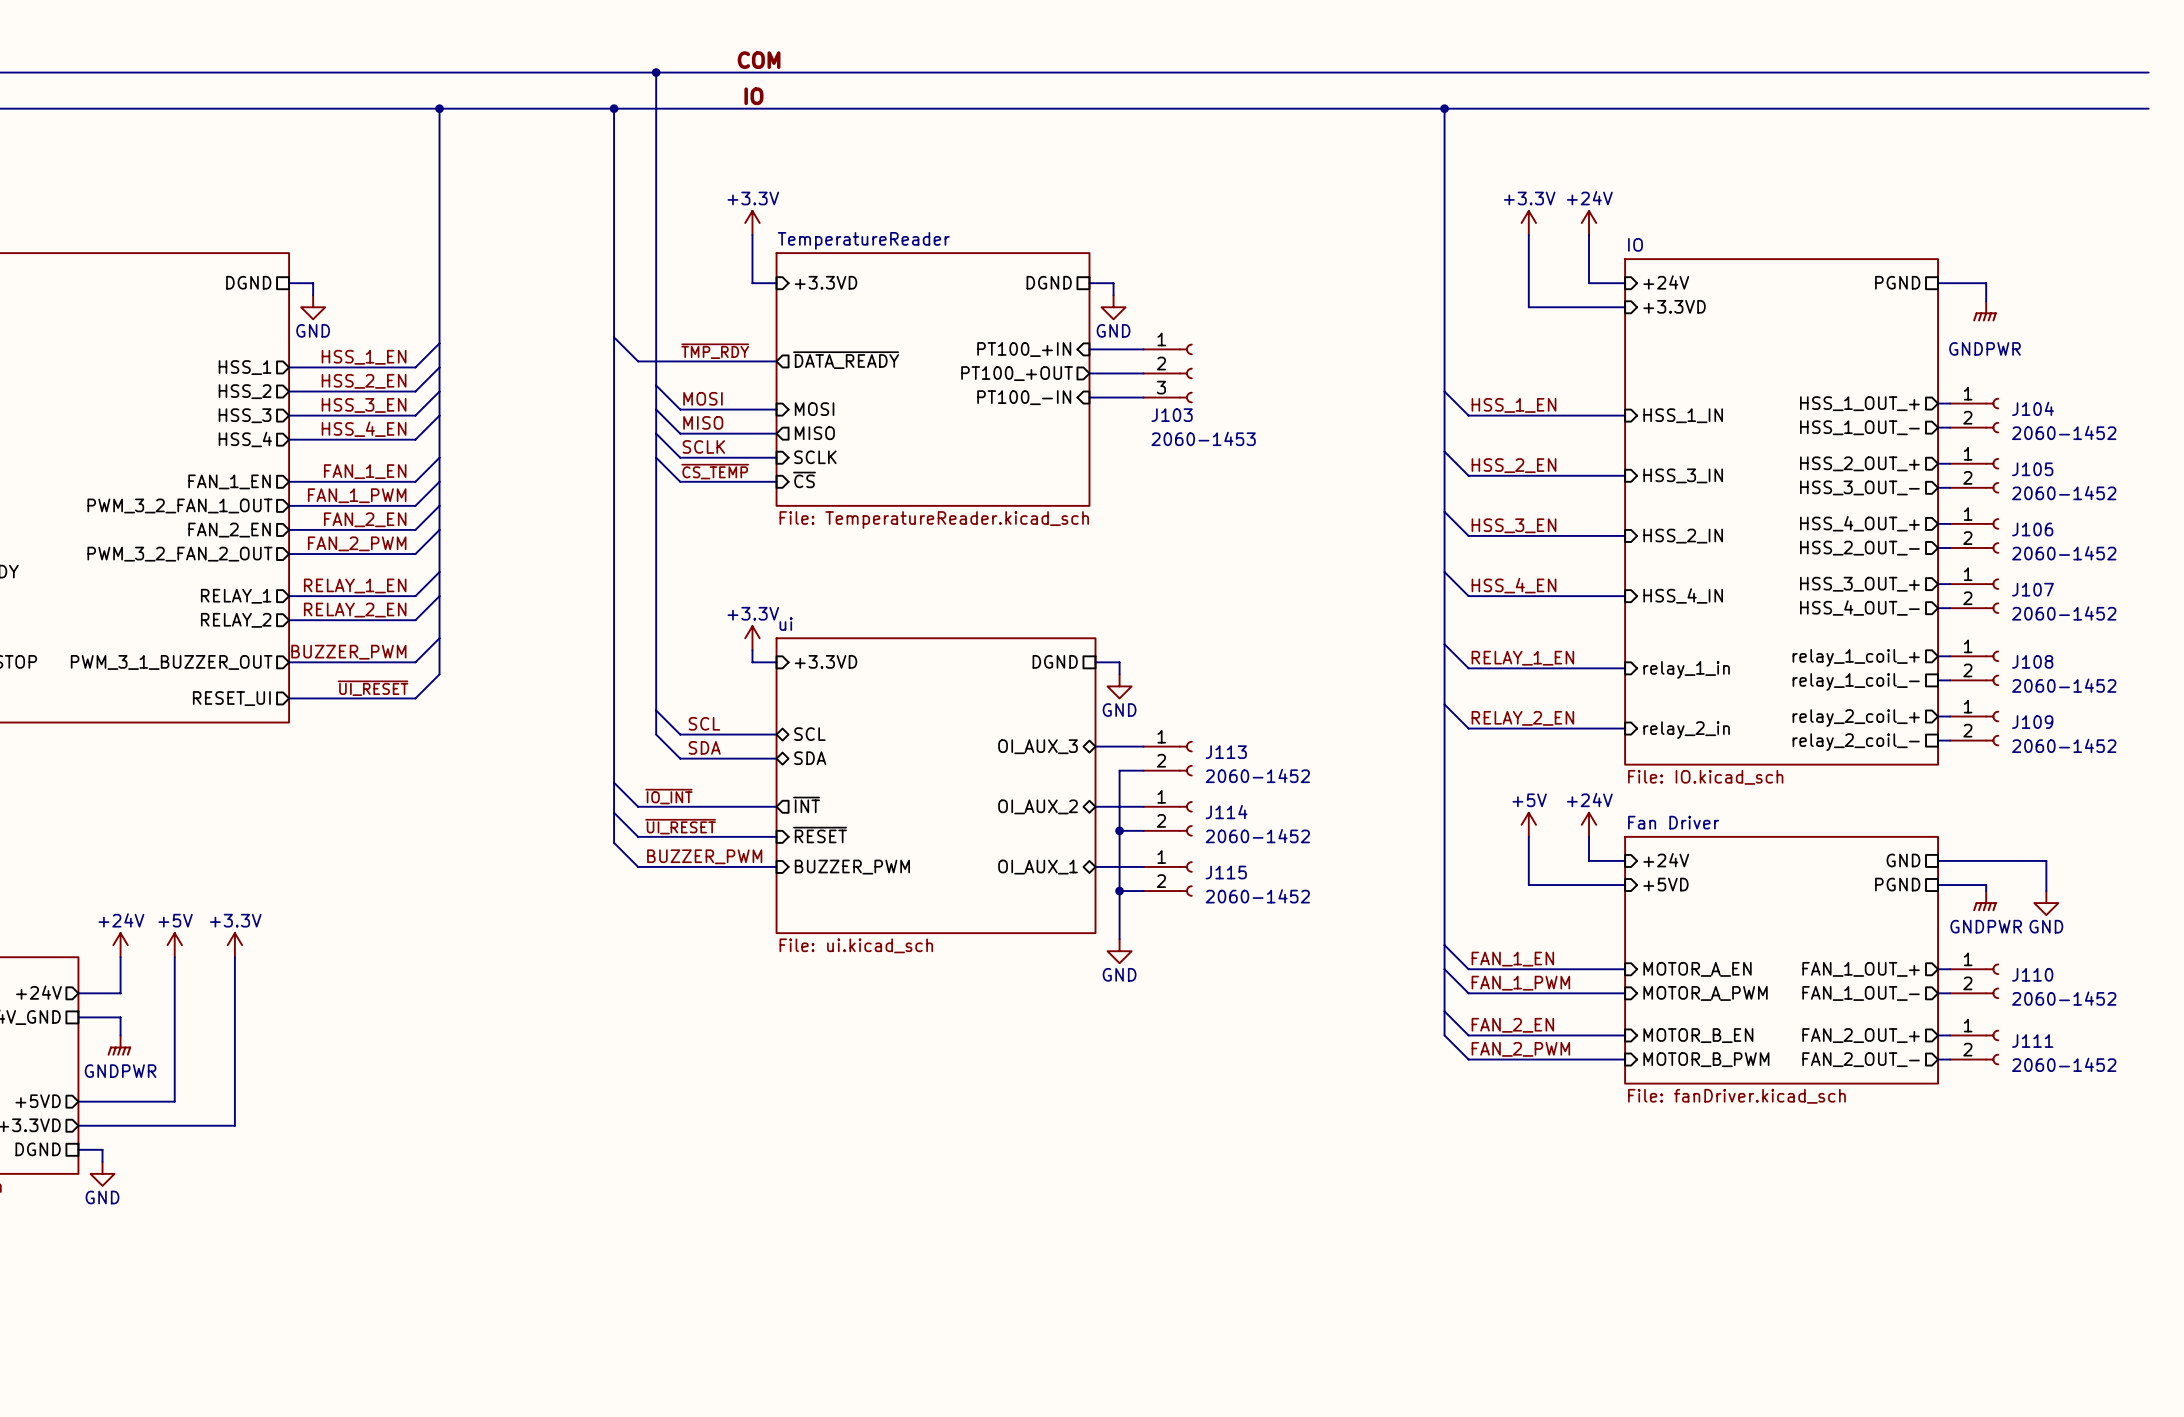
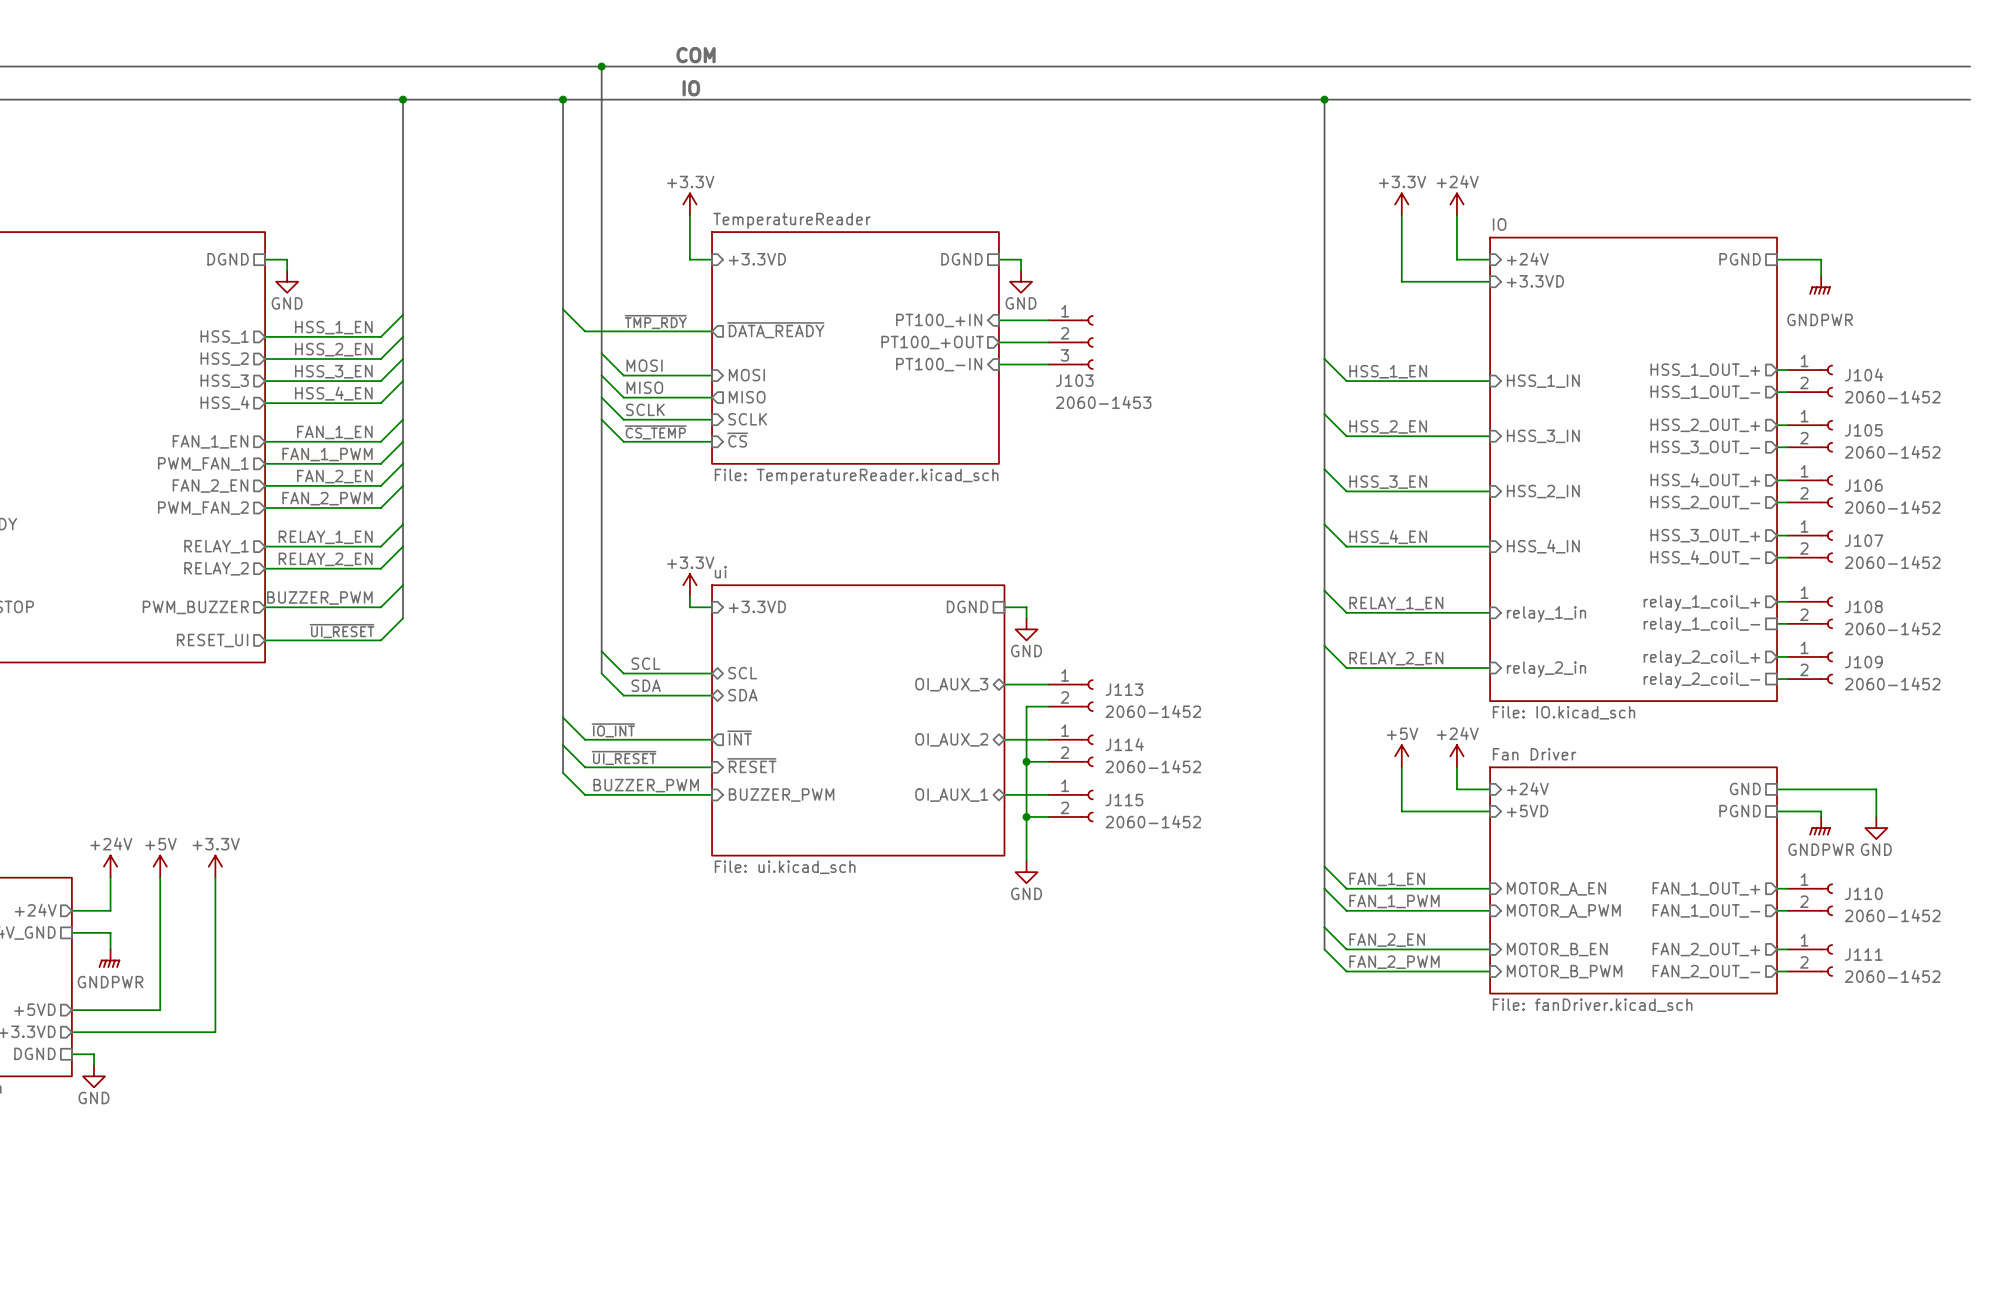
sheet pin: PWM_3_2_FAN_1_OUT (179, 505) -> PWM_FAN_1 (203, 463)
sheet pin: PWM_3_2_FAN_2_OUT (179, 554) -> PWM_FAN_2 (203, 508)
sheet pin: PWM_3_1_BUZZER_OUT (171, 662) -> PWM_BUZZER (195, 607)

